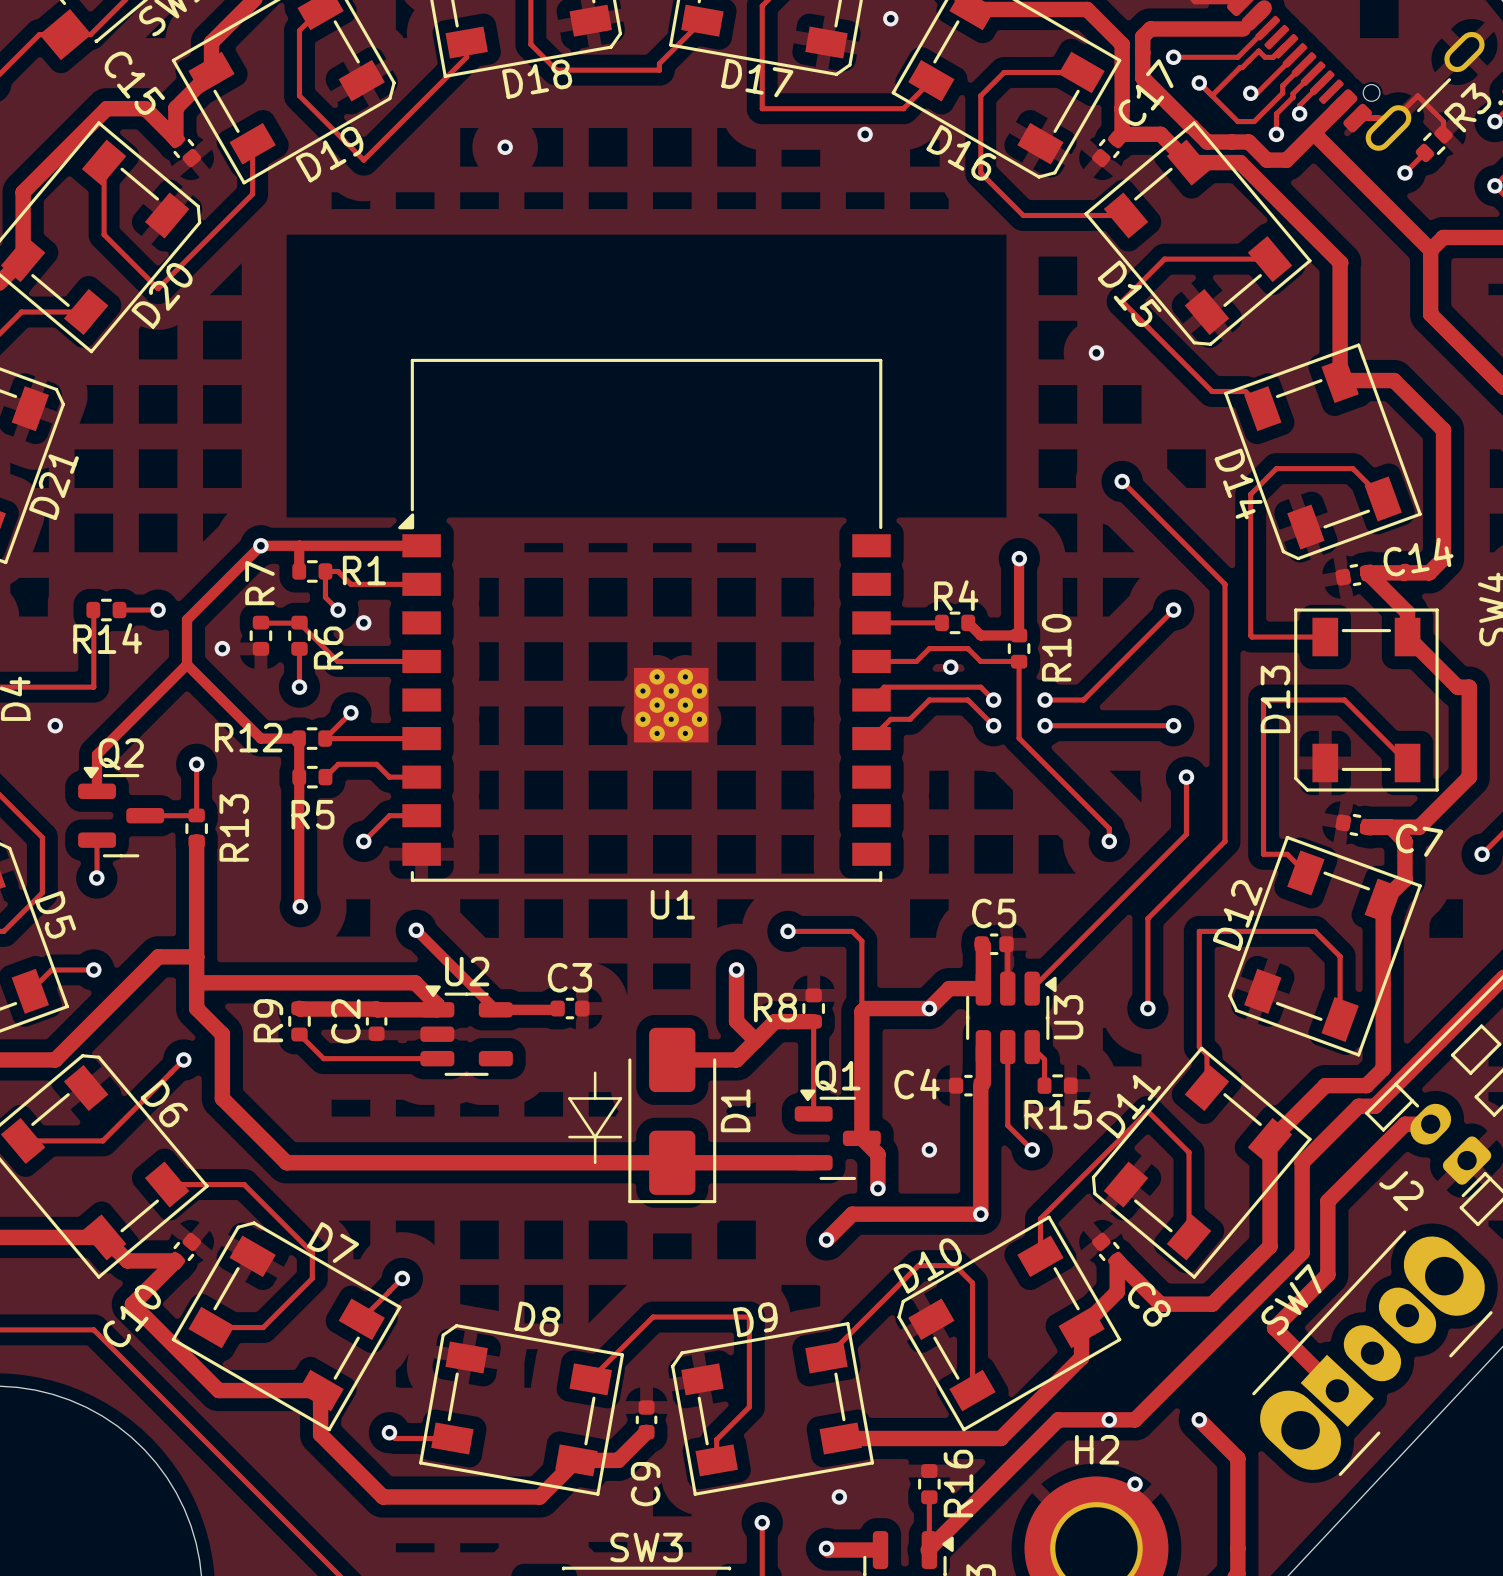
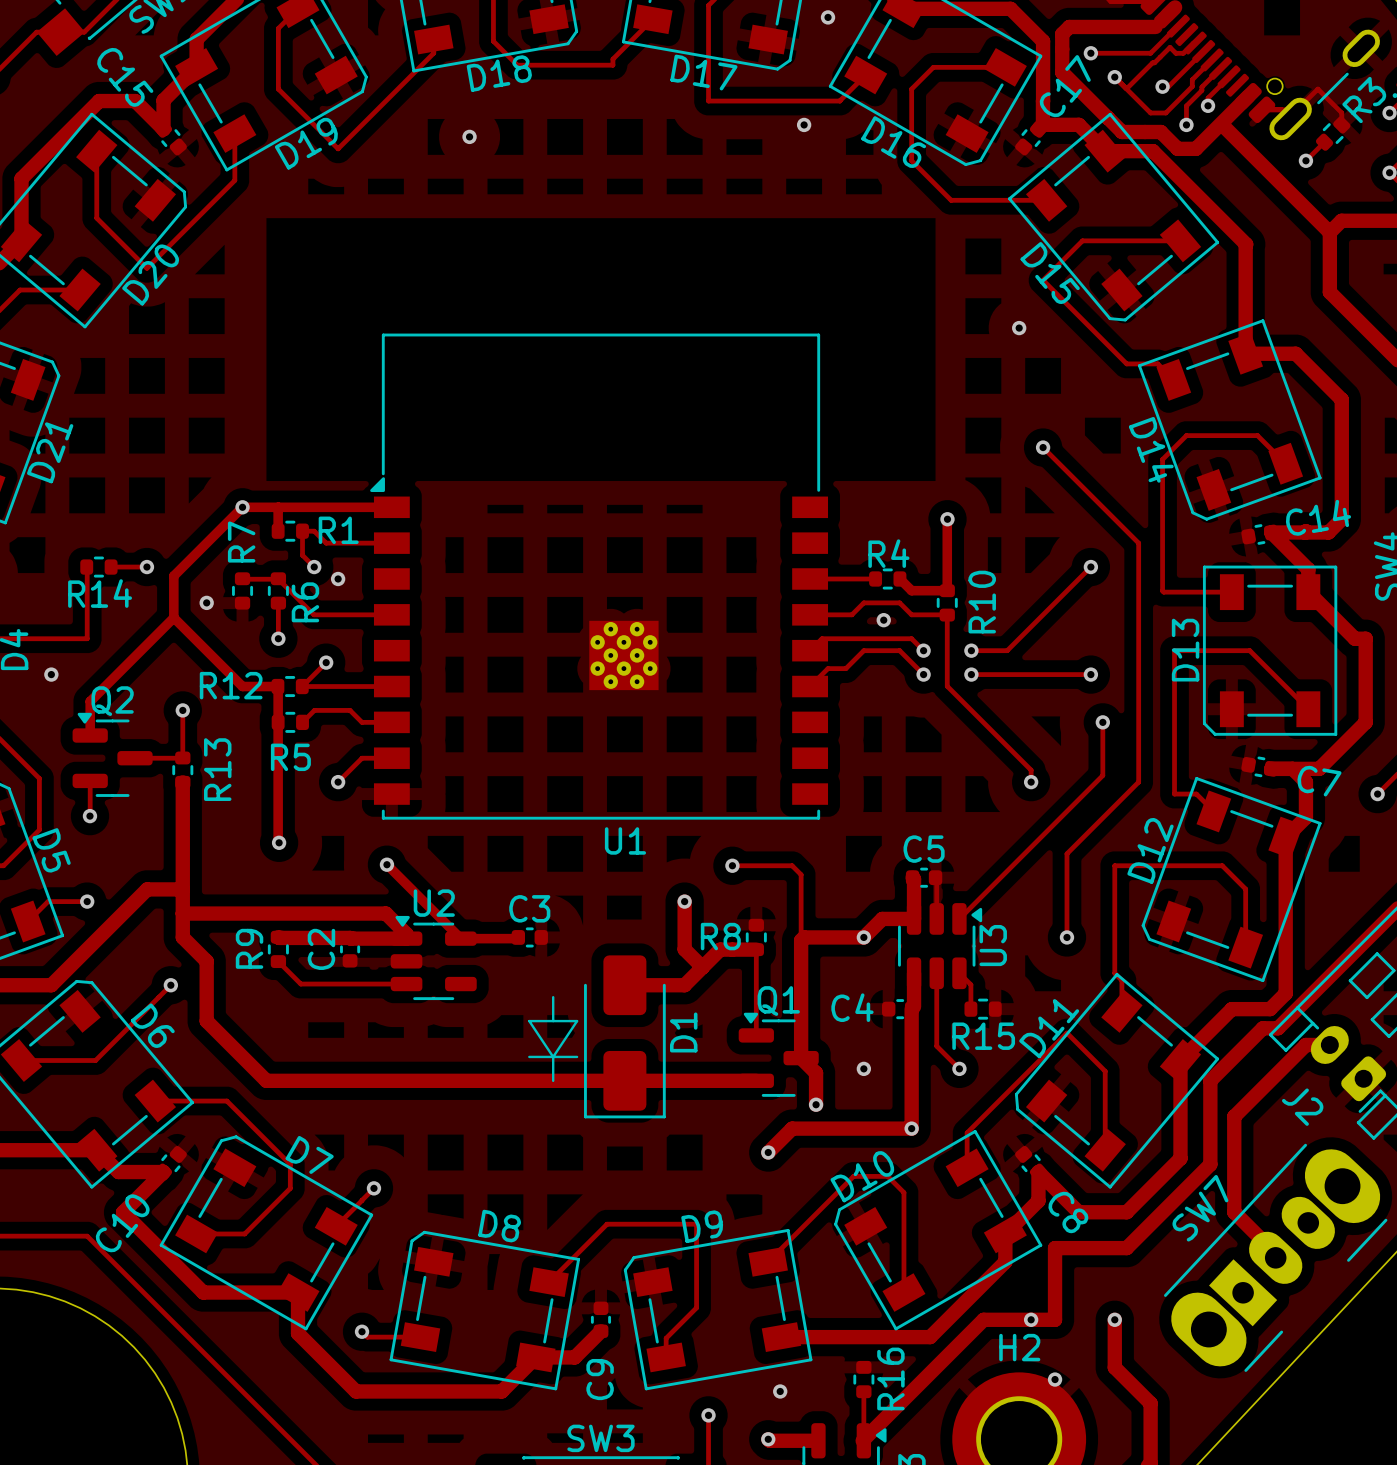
track: (1327, 1274) (1274, 1327) (1337, 1390) -> (1234, 1184) (1234, 1212) (1275, 1253) (1275, 1257)
track: (1212, 1342) (1135, 1419) -> (1126, 1248) (1055, 1248) (1055, 1319)
track: (1199, 1419) (1237, 1458) (1237, 1509) -> (1114, 1319) (1114, 1367) (1150, 1403)

